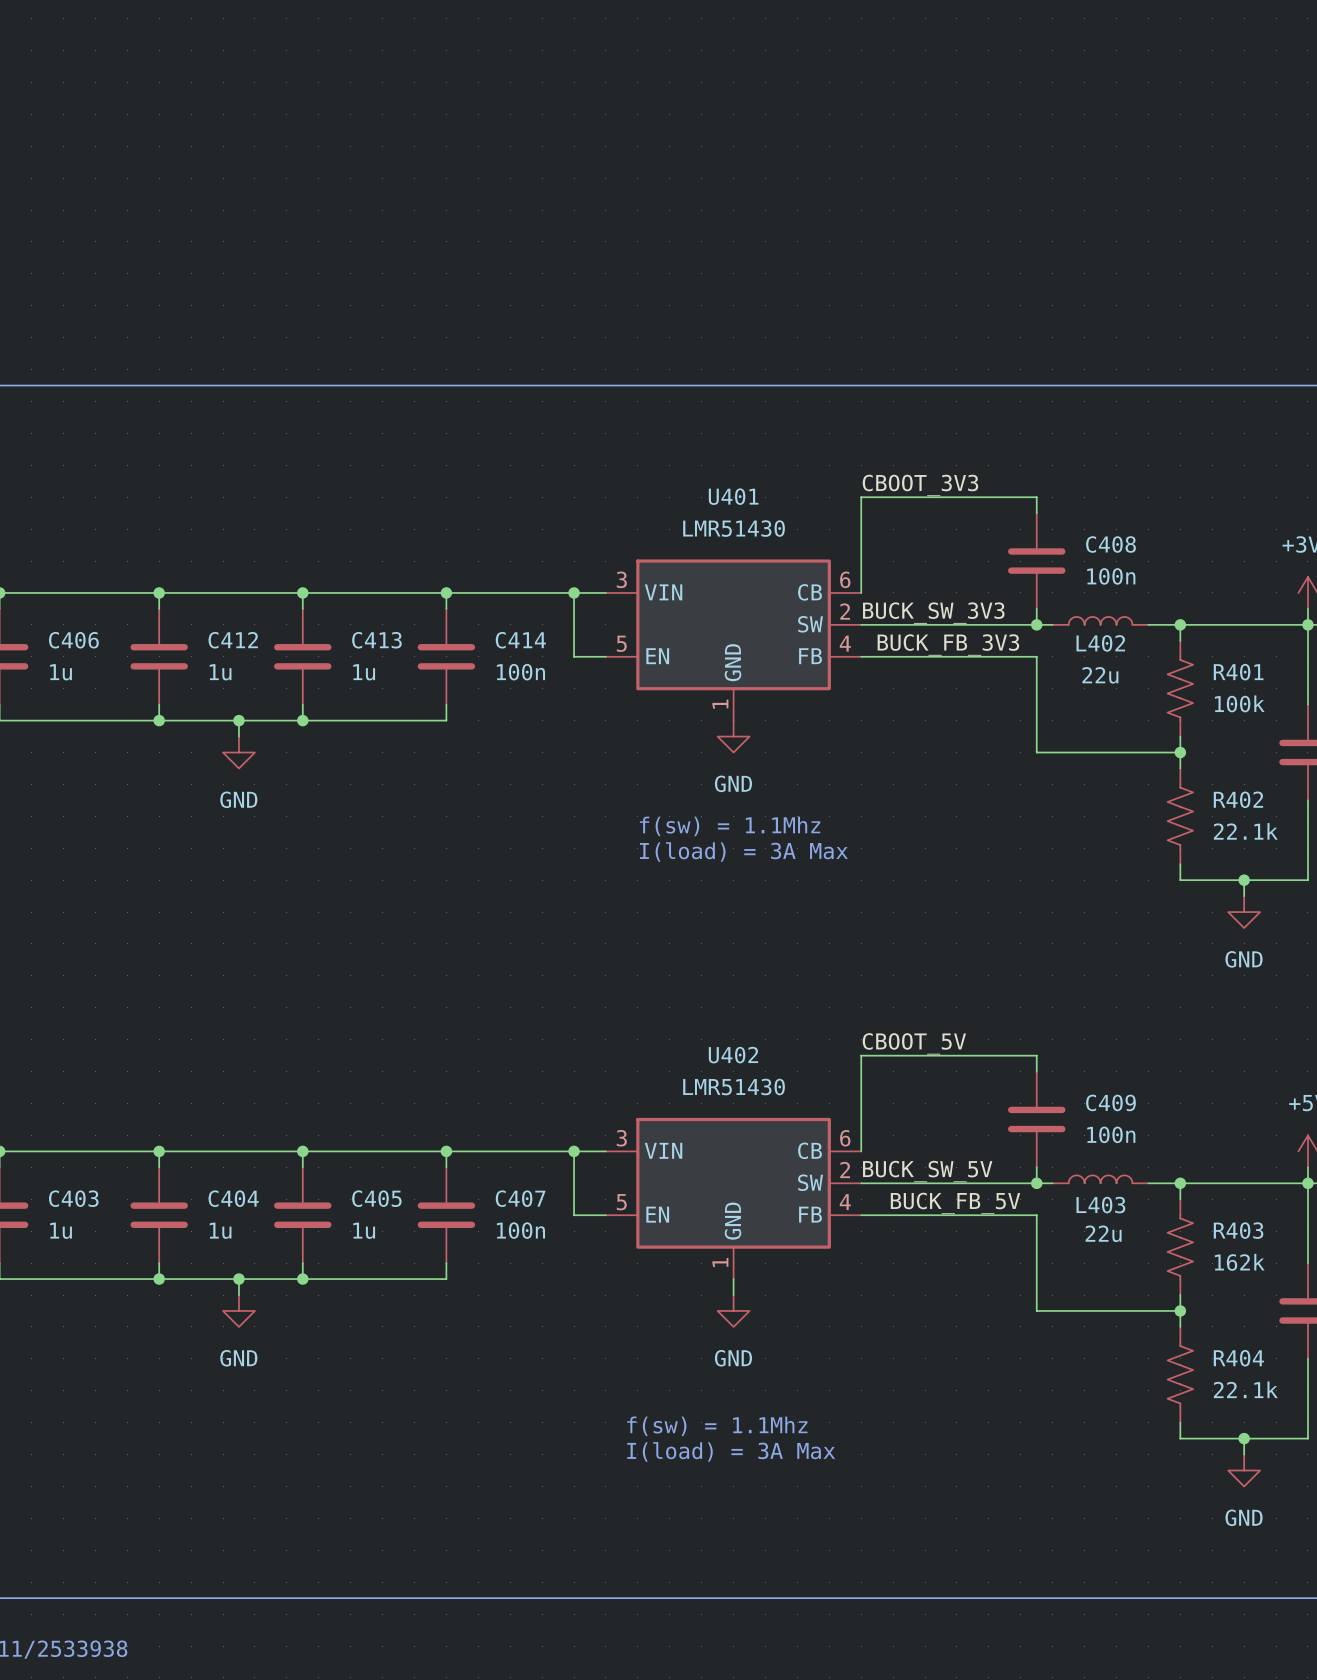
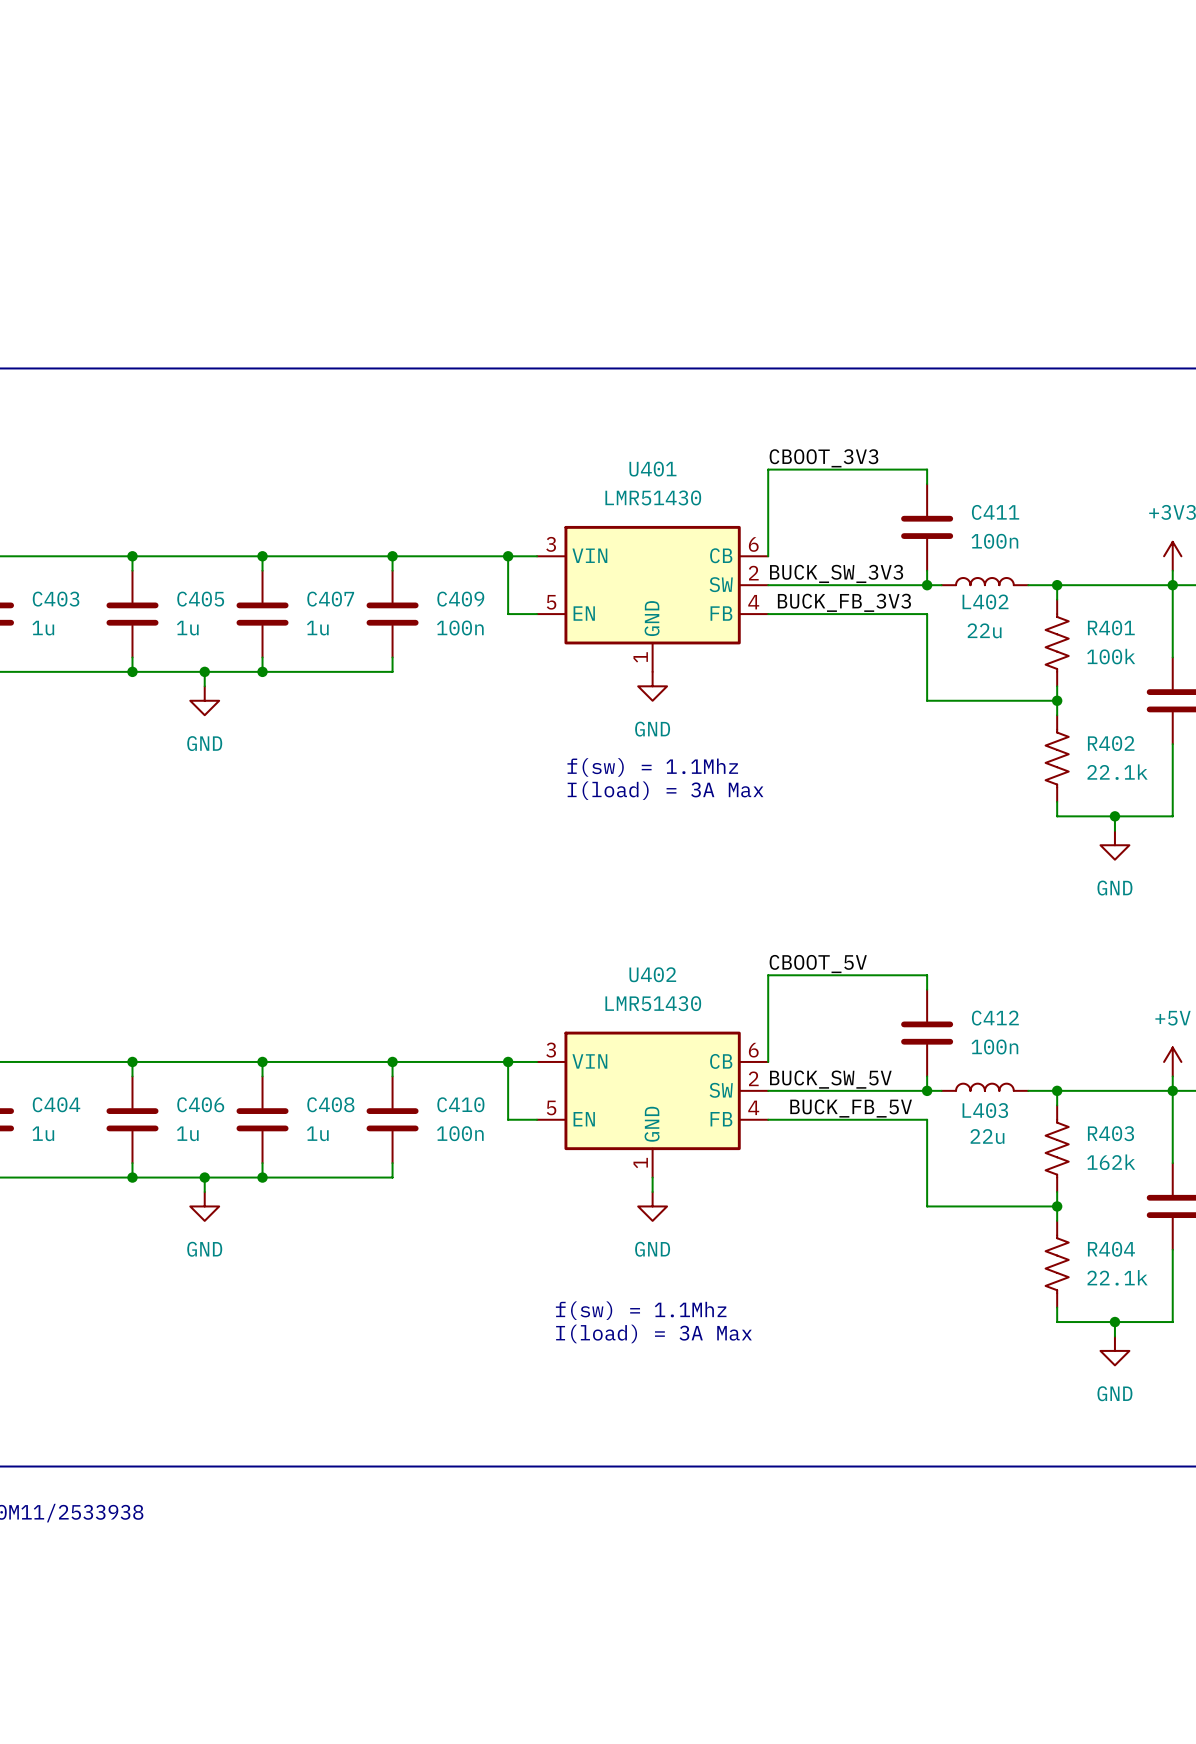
C408 name: C408 (1111, 544) -> C411 (995, 512)
C406 name: C406 (73, 640) -> C403 (56, 599)
C412 name: C412 (233, 640) -> C405 (200, 599)
C413 name: C413 (376, 640) -> C407 (330, 599)
C414 name: C414 (520, 640) -> C409 (460, 599)
C409 name: C409 (1110, 1102) -> C412 (995, 1018)
C403 name: C403 (73, 1198) -> C404 (56, 1104)
C404 name: C404 (233, 1198) -> C406 (200, 1104)
C405 name: C405 (376, 1198) -> C408 (330, 1104)
C407 name: C407 (520, 1198) -> C410 (460, 1104)

